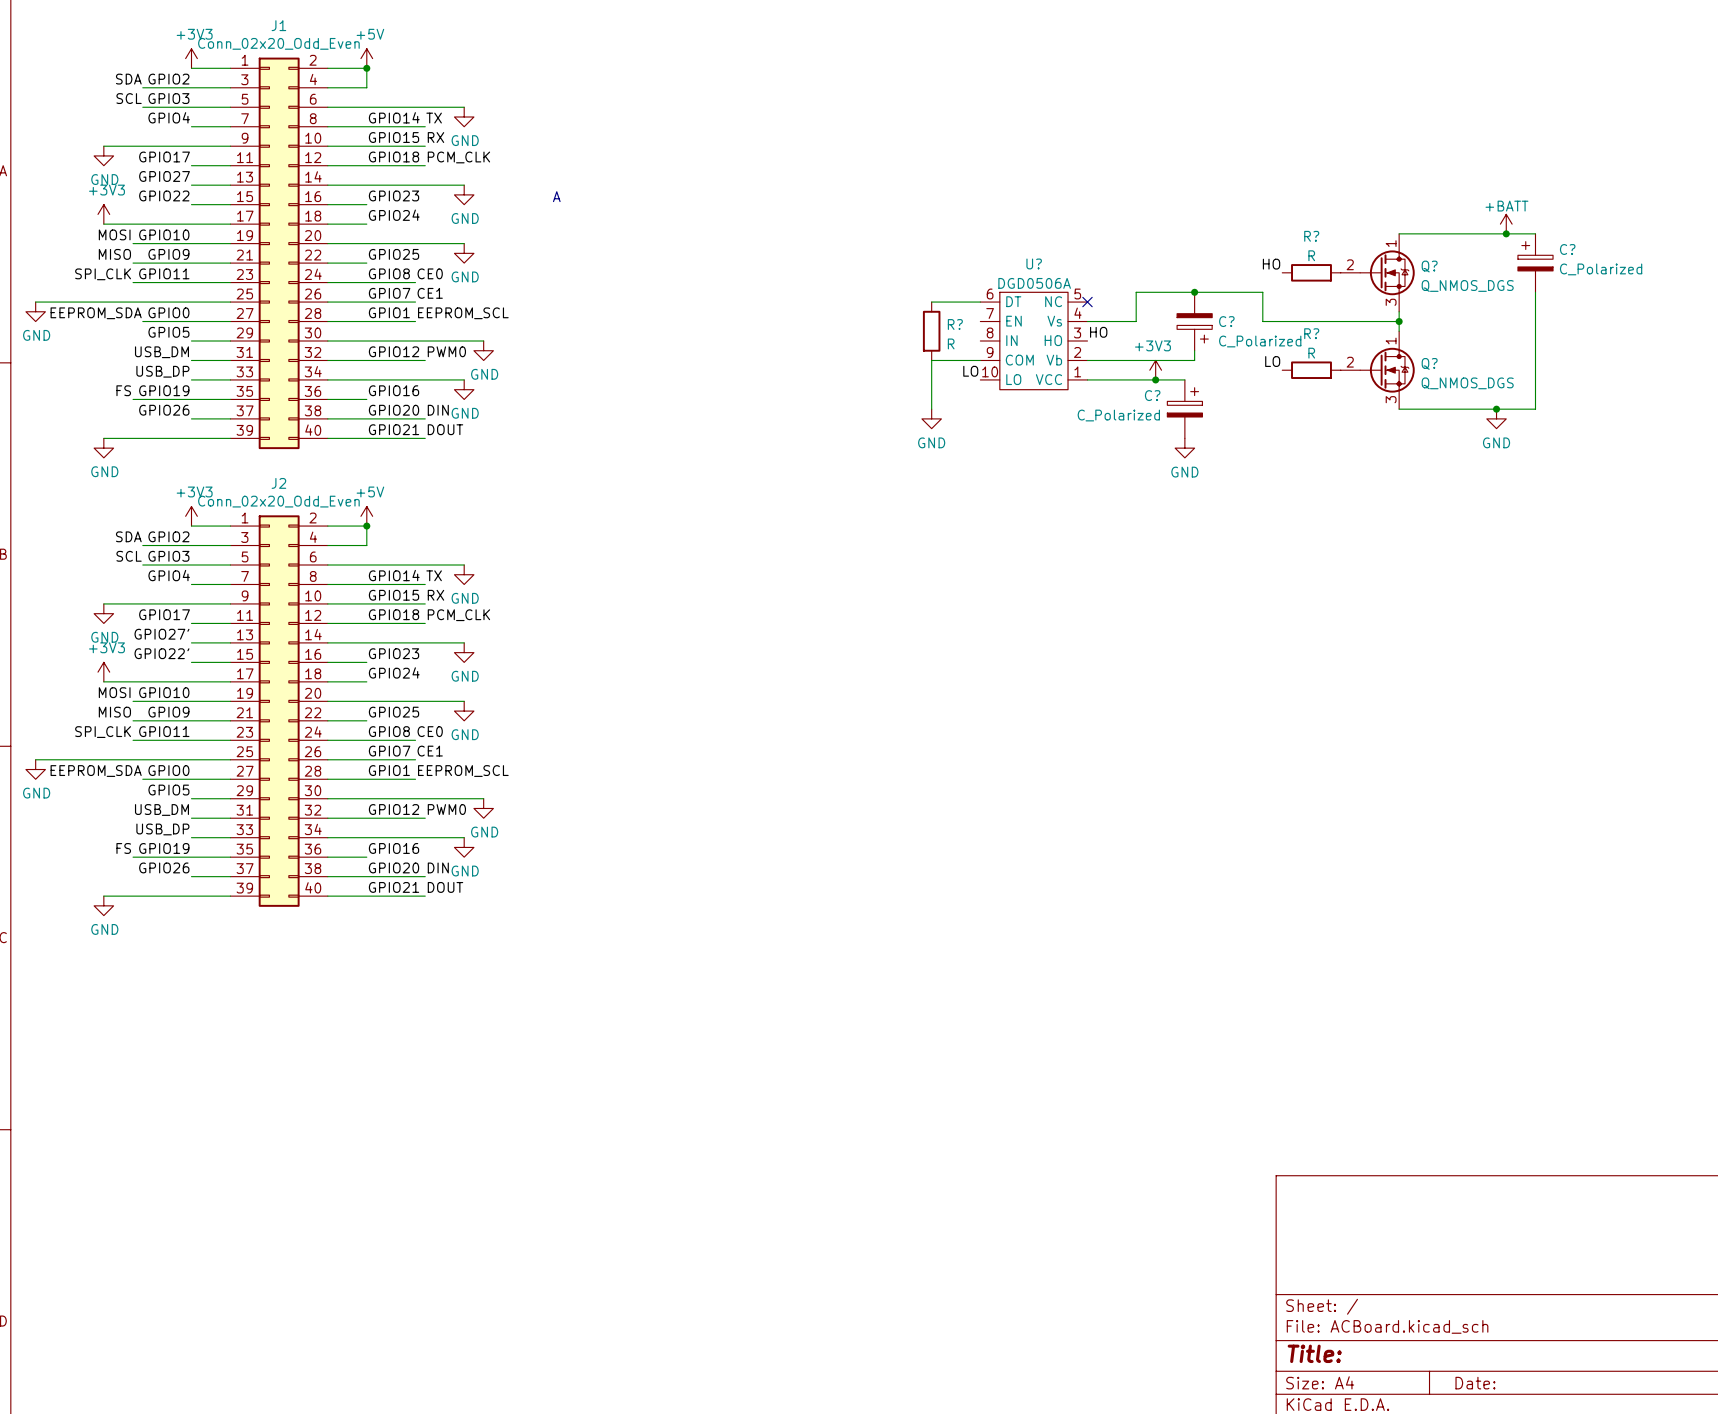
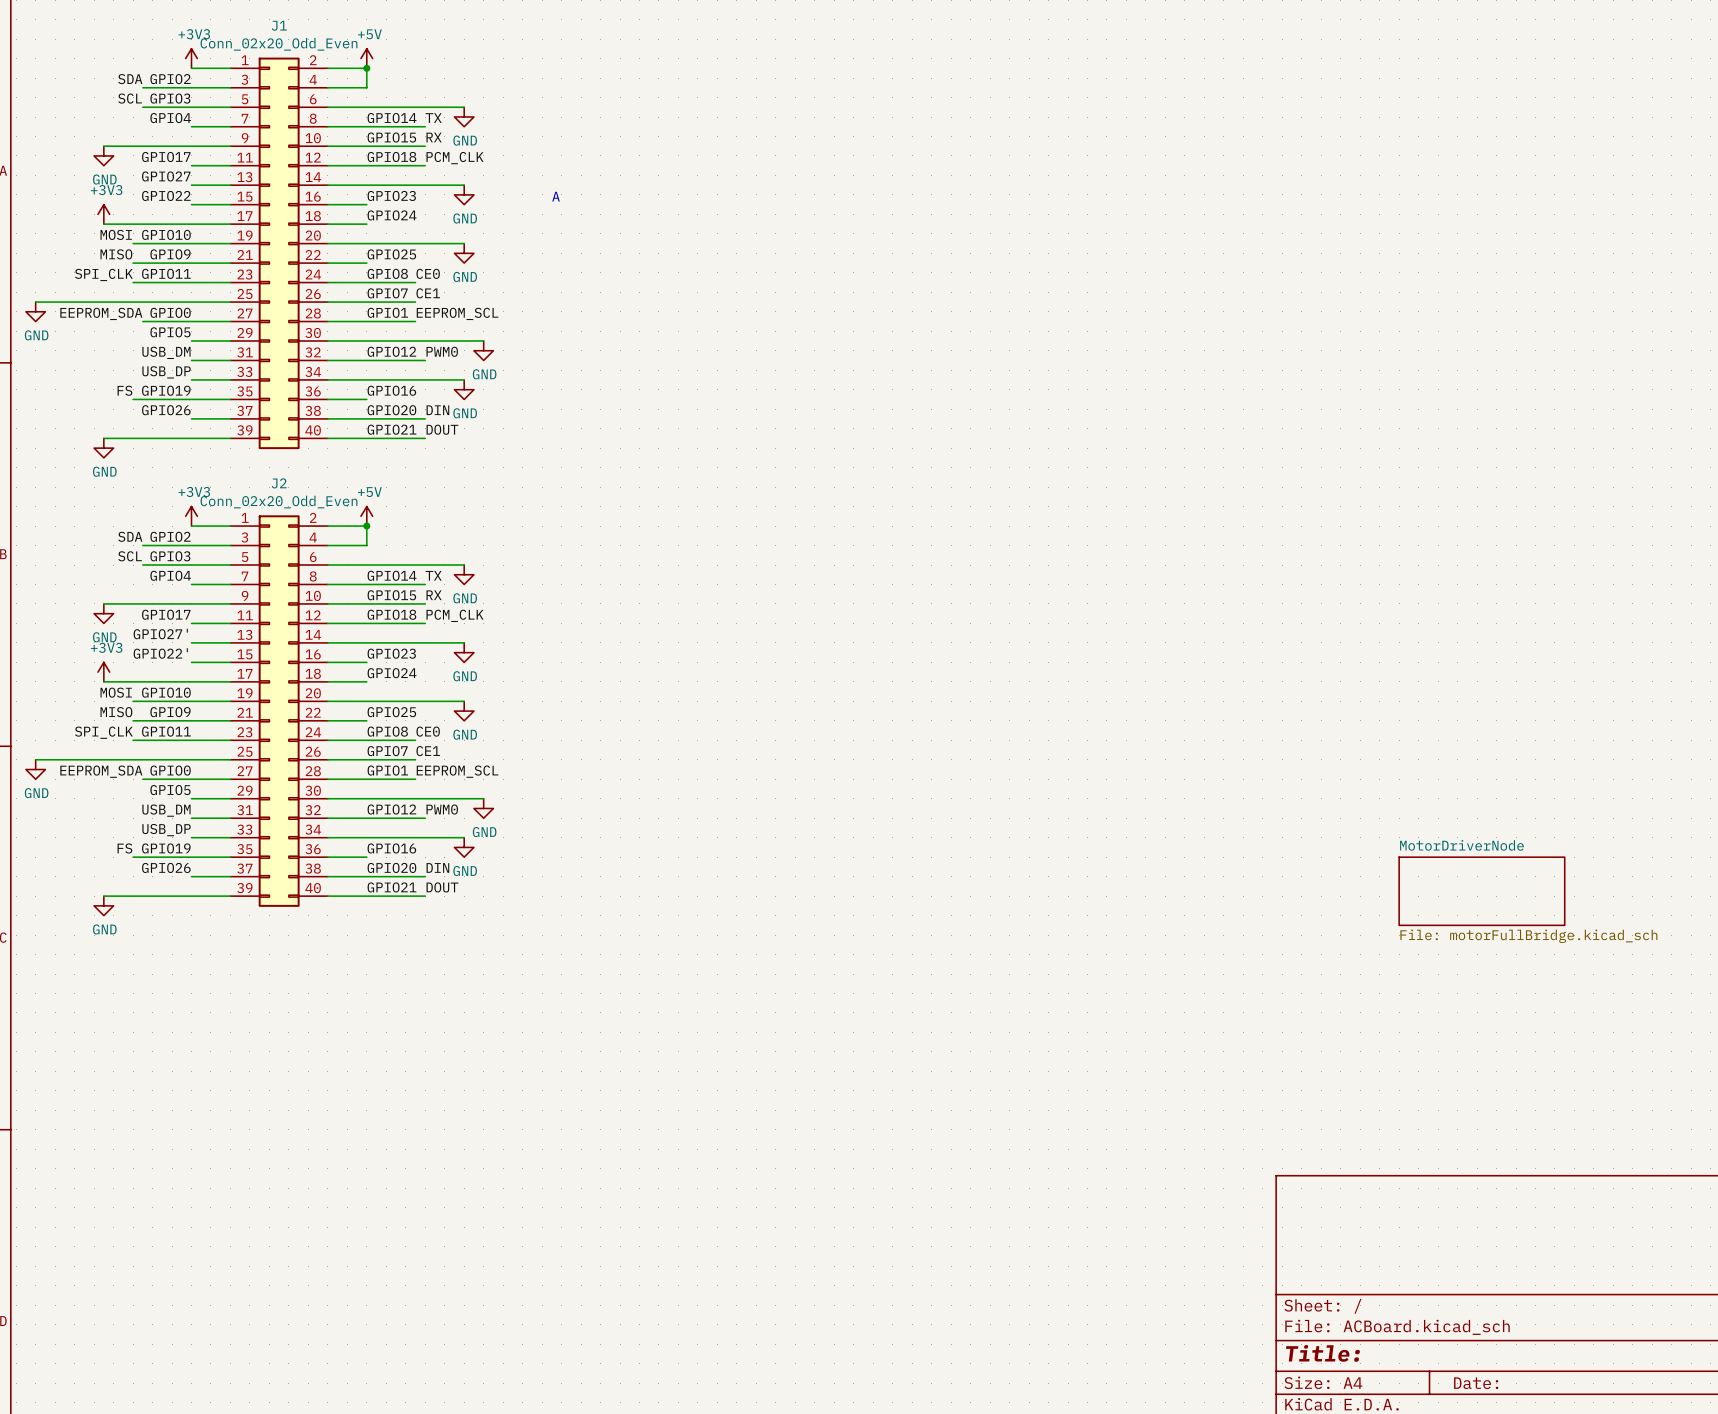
power symbol: +BATT (1506, 224) -> none
wire: (1399, 233) (1535, 233) -> none
junction: (1506, 233) -> none
C?: C_Polarized (1535, 263) -> none
label: HO (1271, 264) -> none
R?: R (1311, 272) -> none
Q?: Q_NMOS_DGS (1377, 272) -> none
junction: (1194, 292) -> none
wire: (1535, 292) (1535, 409) (1399, 409) -> none
wire: (931, 302) (980, 302) -> none
no-connect mark: (1087, 302) -> none
wire: (1399, 311) (1399, 331) -> none
wire: (1087, 321) (1136, 321) (1136, 292) (1262, 292) (1262, 321) (1399, 321) -> none
C?: C_Polarized (1194, 321) -> none
junction: (1399, 321) -> none
R?: R (931, 331) -> none
label: HO (1098, 332) -> none
U?: DGD0506A (1033, 341) -> none
wire: (1194, 350) (1194, 360) (1087, 360) -> none
wire: (980, 360) (931, 360) (931, 409) -> none
label: LO (1272, 361) -> none
power symbol: +3V3 (1155, 370) -> none
R?: R (1311, 370) -> none
Q?: Q_NMOS_DGS (1377, 370) -> none
label: LO (970, 371) -> none
wire: (1087, 379) (1184, 379) -> none
junction: (1155, 379) -> none
C?: C_Polarized (1184, 409) -> none
junction: (1496, 409) -> none
power symbol: GND (931, 418) -> none
power symbol: GND (1496, 418) -> none
power symbol: GND (1184, 448) -> none
sheet MotorDriverNode: none -> File: motorFullBridge.kicad_sch (1481, 891)

